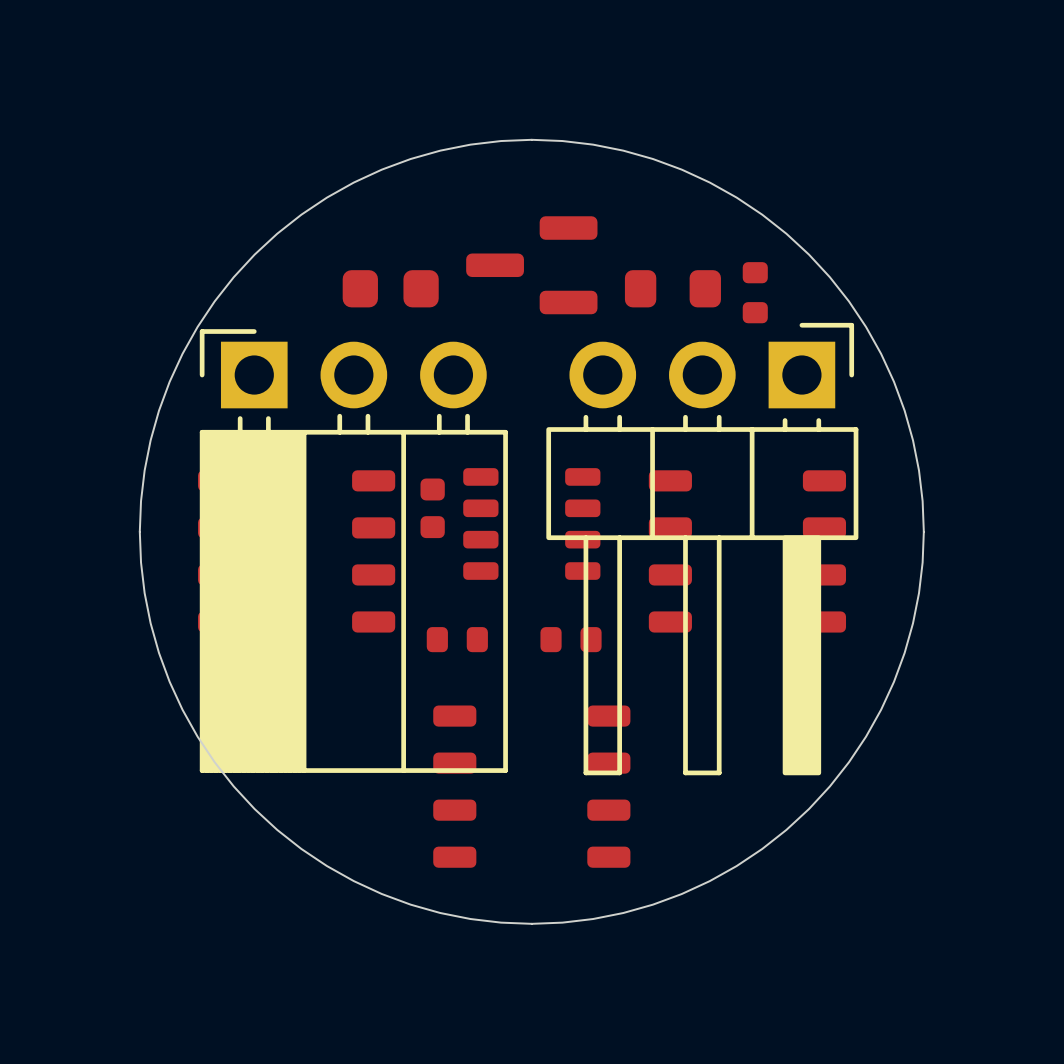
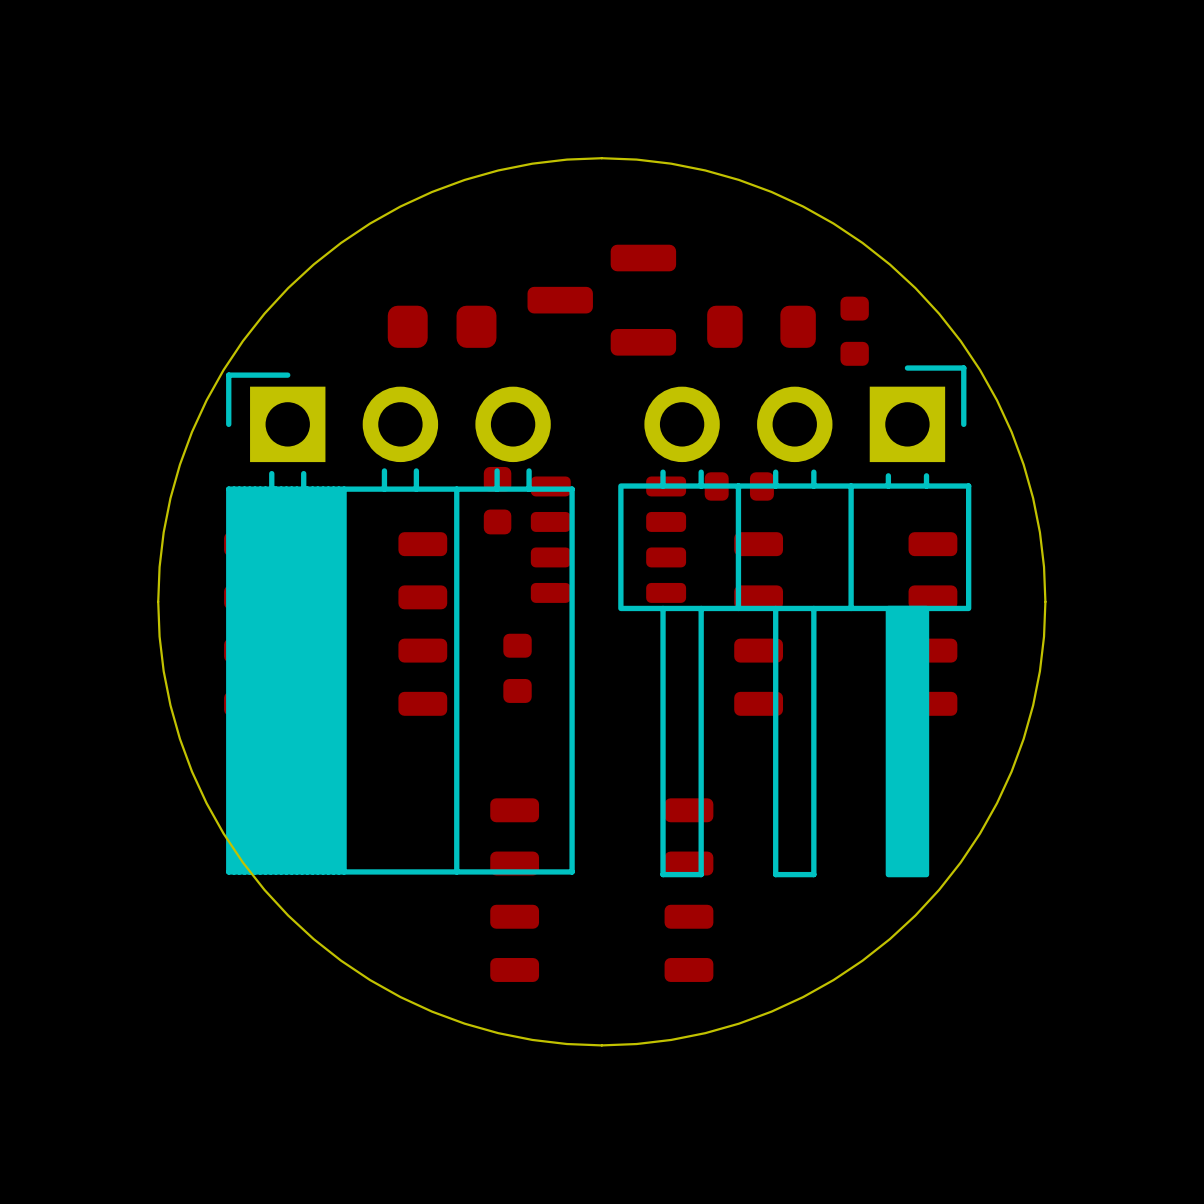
part: none -> (739, 486)
part position: (432, 508) -> (497, 500)
part position: (531, 523) -> (608, 539)
part rotation: 0° (457, 639) -> 90° clockwise (517, 668)
part position: (457, 639) -> (517, 668)
part: (571, 639) -> none

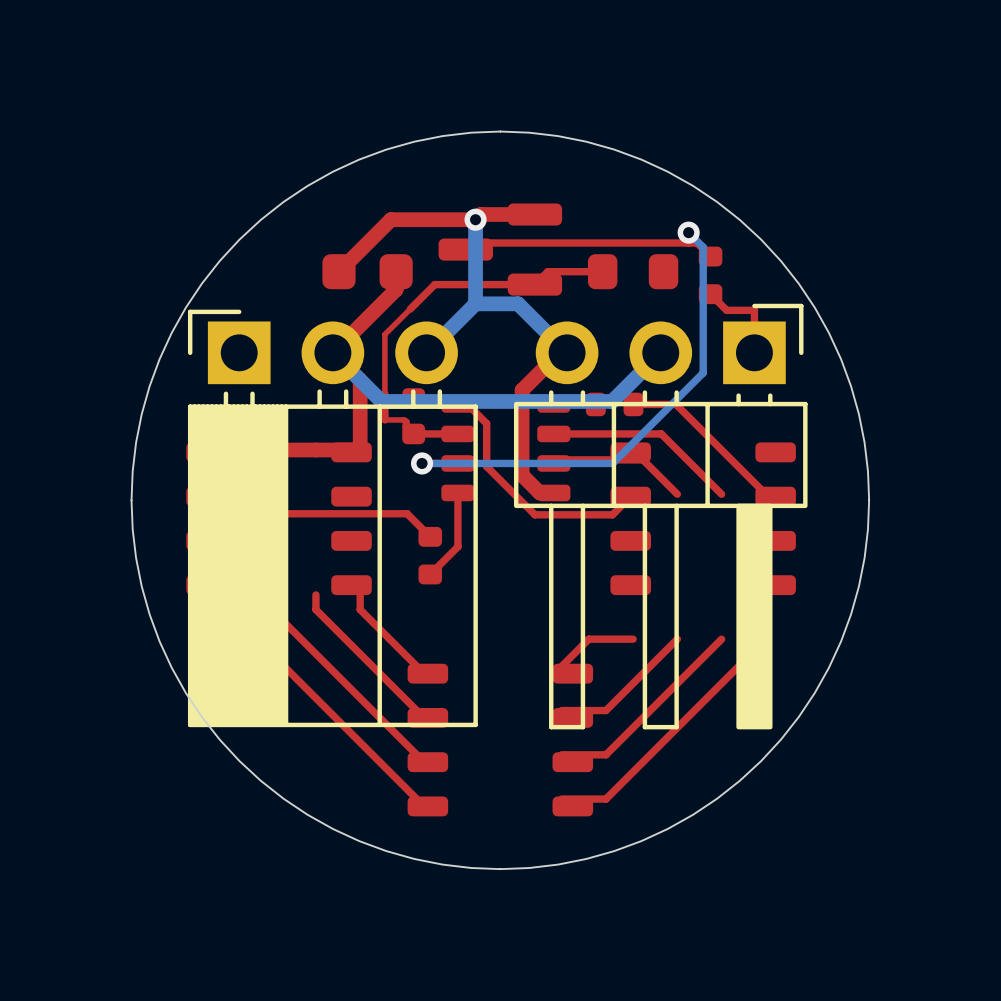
top track: none -> (534, 214) (480, 214) (475, 219) (390, 219) (338, 271)
bottom track: none -> (475, 219) (475, 303)
via: none -> (475, 219)
bottom track: none -> (688, 232) (703, 247) (703, 372) (612, 463) (422, 463)
via: none -> (688, 232)
top track: none -> (465, 249) (472, 243) (697, 243) (710, 256)
top track: none -> (396, 271) (396, 289) (332, 352) (360, 380) (360, 449) (227, 449)
top track: none -> (602, 271) (547, 271) (534, 284) (434, 284) (384, 334) (384, 419) (404, 419) (406, 426) (413, 433) (457, 433)
top track: none -> (710, 294) (726, 310) (754, 310) (754, 352)
bottom track: none -> (475, 303) (426, 352)
bottom track: none -> (475, 303) (518, 303) (567, 352)
top track: none -> (567, 352) (559, 352) (522, 390) (522, 475) (539, 492) (553, 492)
bottom track: none -> (660, 352) (612, 401) (381, 401) (332, 352)
top track: none -> (457, 404) (467, 404) (486, 423) (486, 466) (534, 514) (612, 514) (633, 494)
top track: none -> (633, 404) (676, 404) (765, 494)
top track: none -> (553, 433) (661, 433) (721, 494)
via: none -> (422, 463)
top track: none -> (553, 463) (557, 459) (643, 459) (677, 494)
top track: none -> (457, 492) (457, 546) (430, 574)
top track: none -> (281, 513) (407, 513) (430, 536)
top track: none -> (227, 594) (227, 609) (416, 799)
top track: none -> (271, 594) (271, 609) (416, 754)
top track: none -> (315, 594) (315, 609) (416, 710)
top track: none -> (360, 594) (360, 609) (416, 666)
top track: none -> (633, 639) (588, 639) (561, 666)
top track: none -> (677, 639) (606, 710) (561, 710)
top track: none -> (721, 639) (606, 754) (561, 754)
top track: none -> (765, 639) (606, 799) (561, 799)

